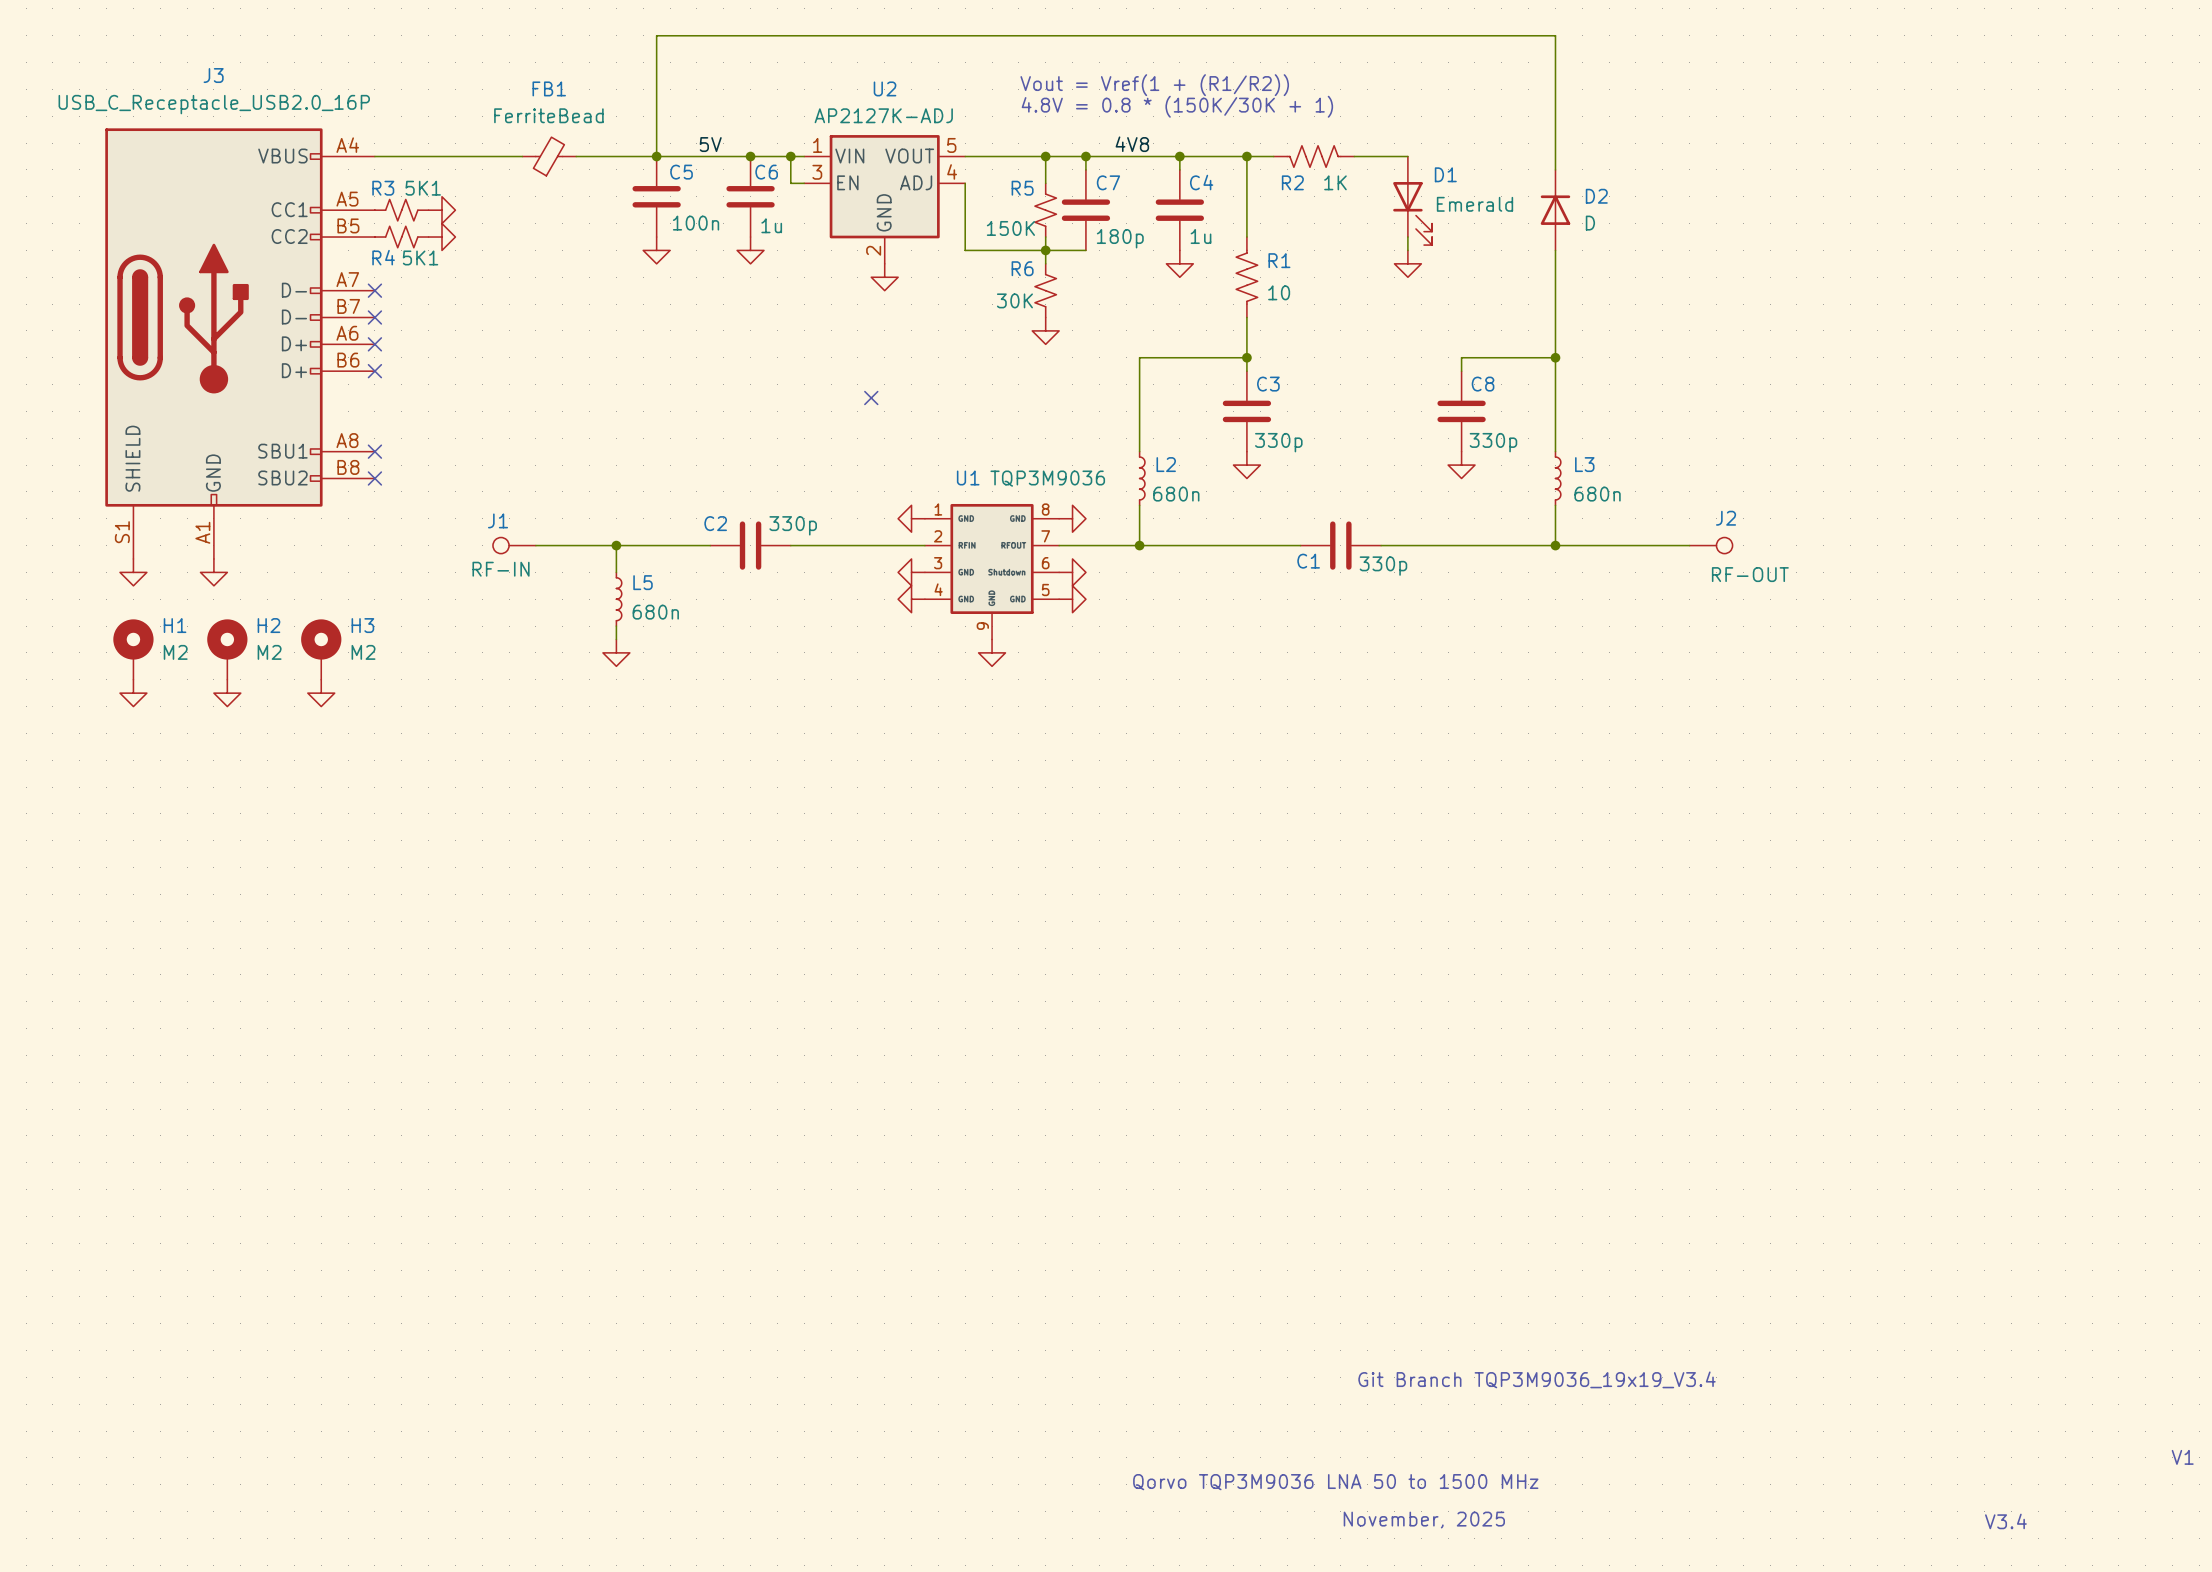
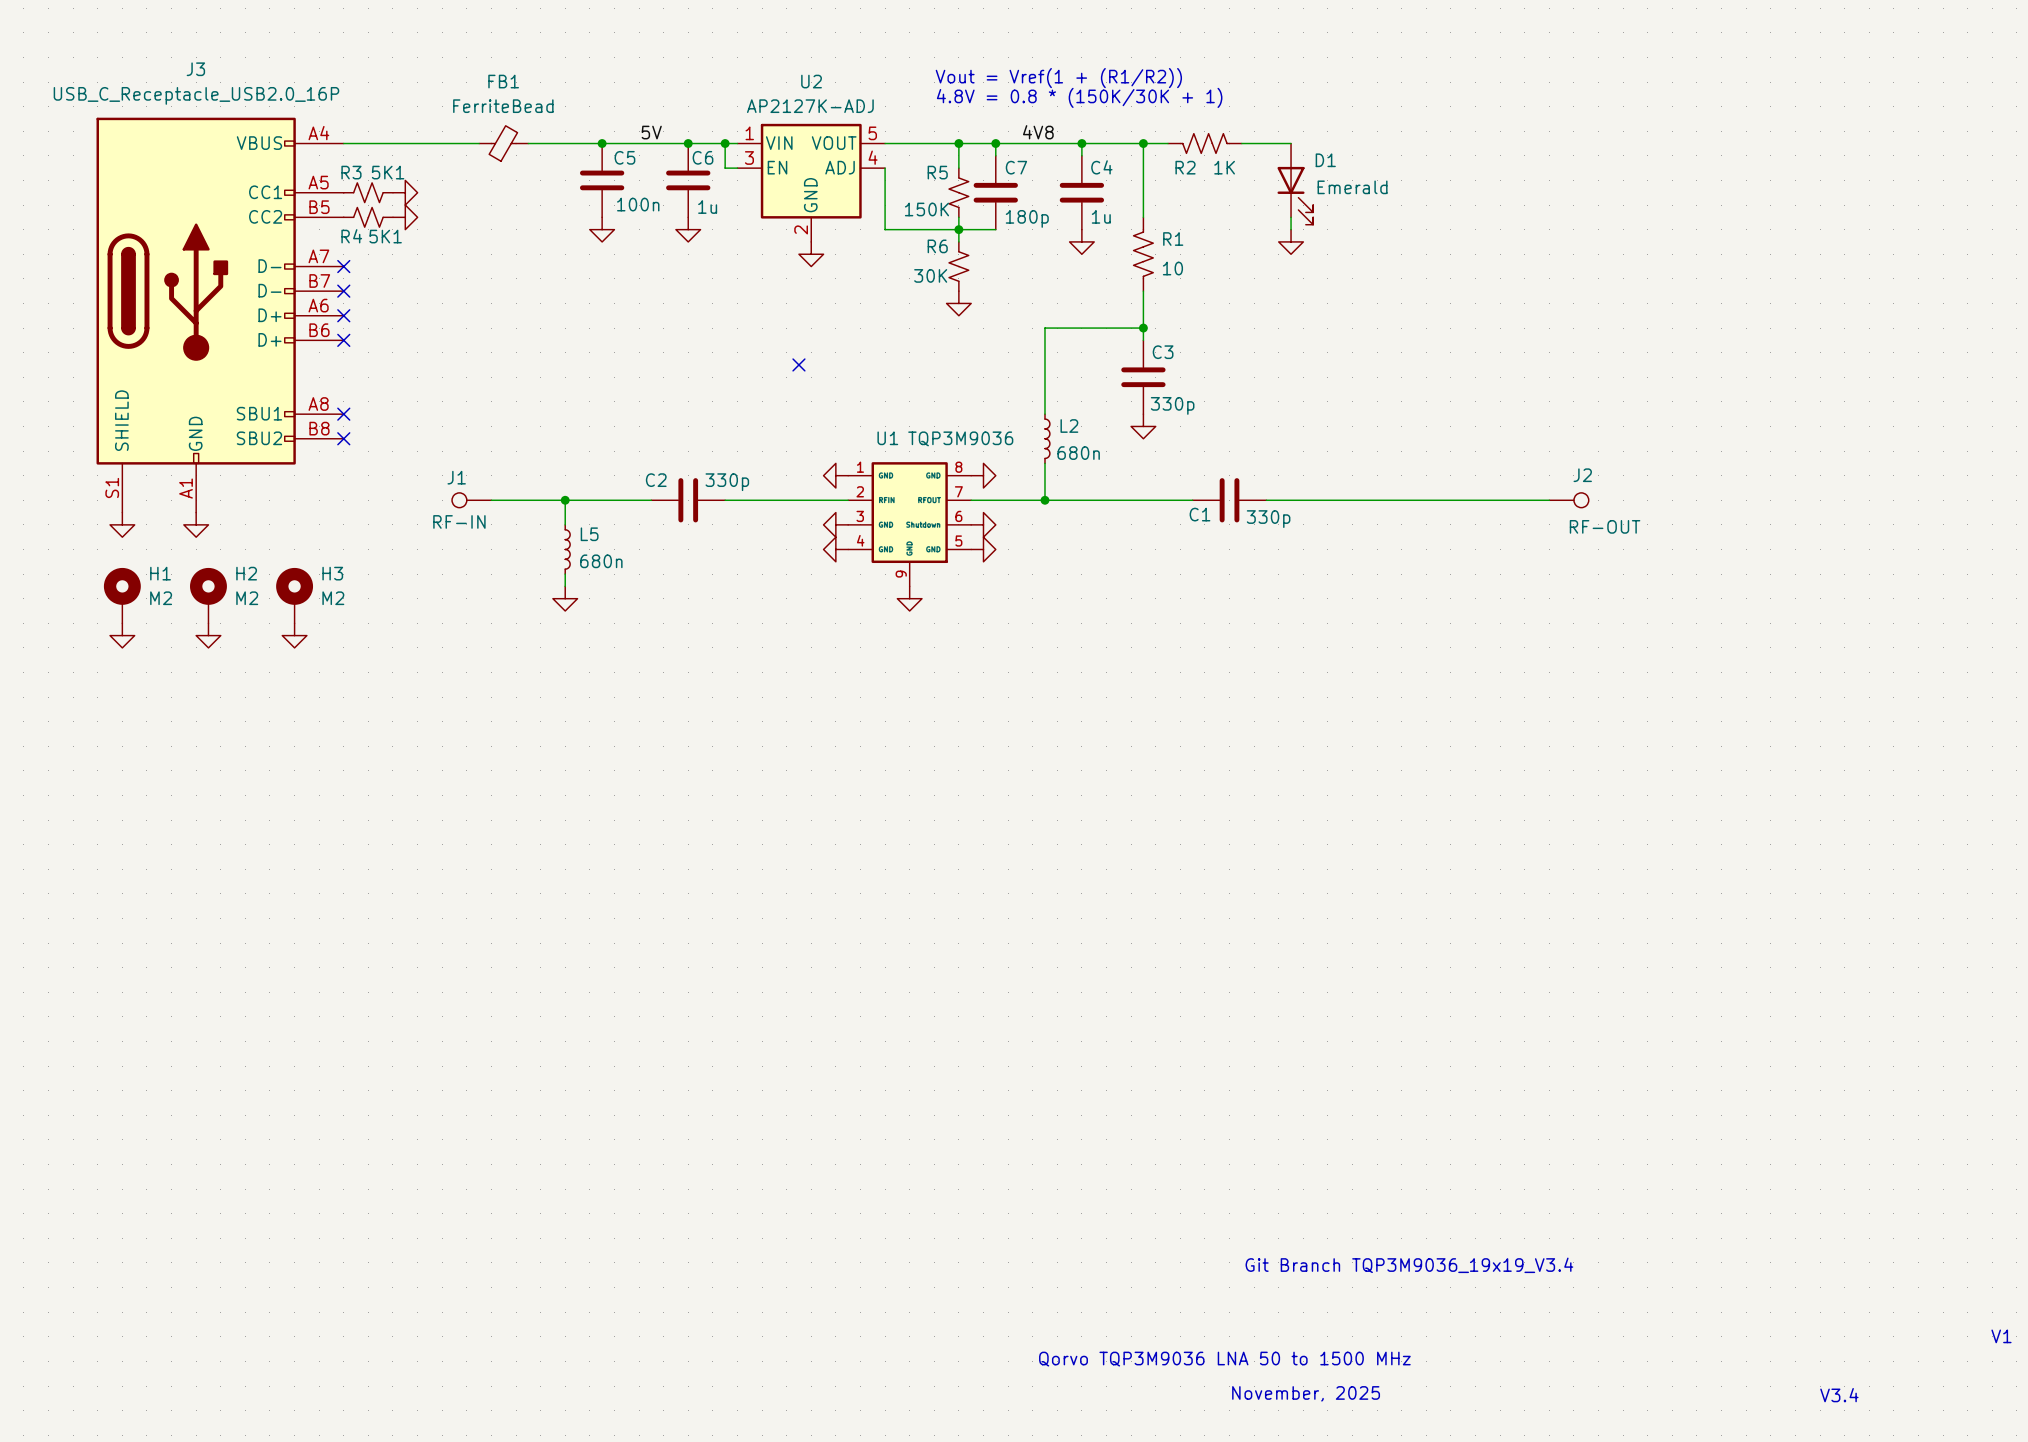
wire: (656, 156) (656, 35) (1555, 35) (1555, 169) -> none
D2: D (1555, 210) -> none
wire: (1555, 250) (1555, 451) -> none
wire: (1555, 357) (1461, 357) (1461, 371) -> none
junction: (1555, 357) -> none
C8: 330p (1461, 411) -> none
power symbol: (1461, 465) -> none
L3: 680n (1558, 478) -> none
wire: (1555, 505) (1555, 545) -> none
junction: (1555, 545) -> none

